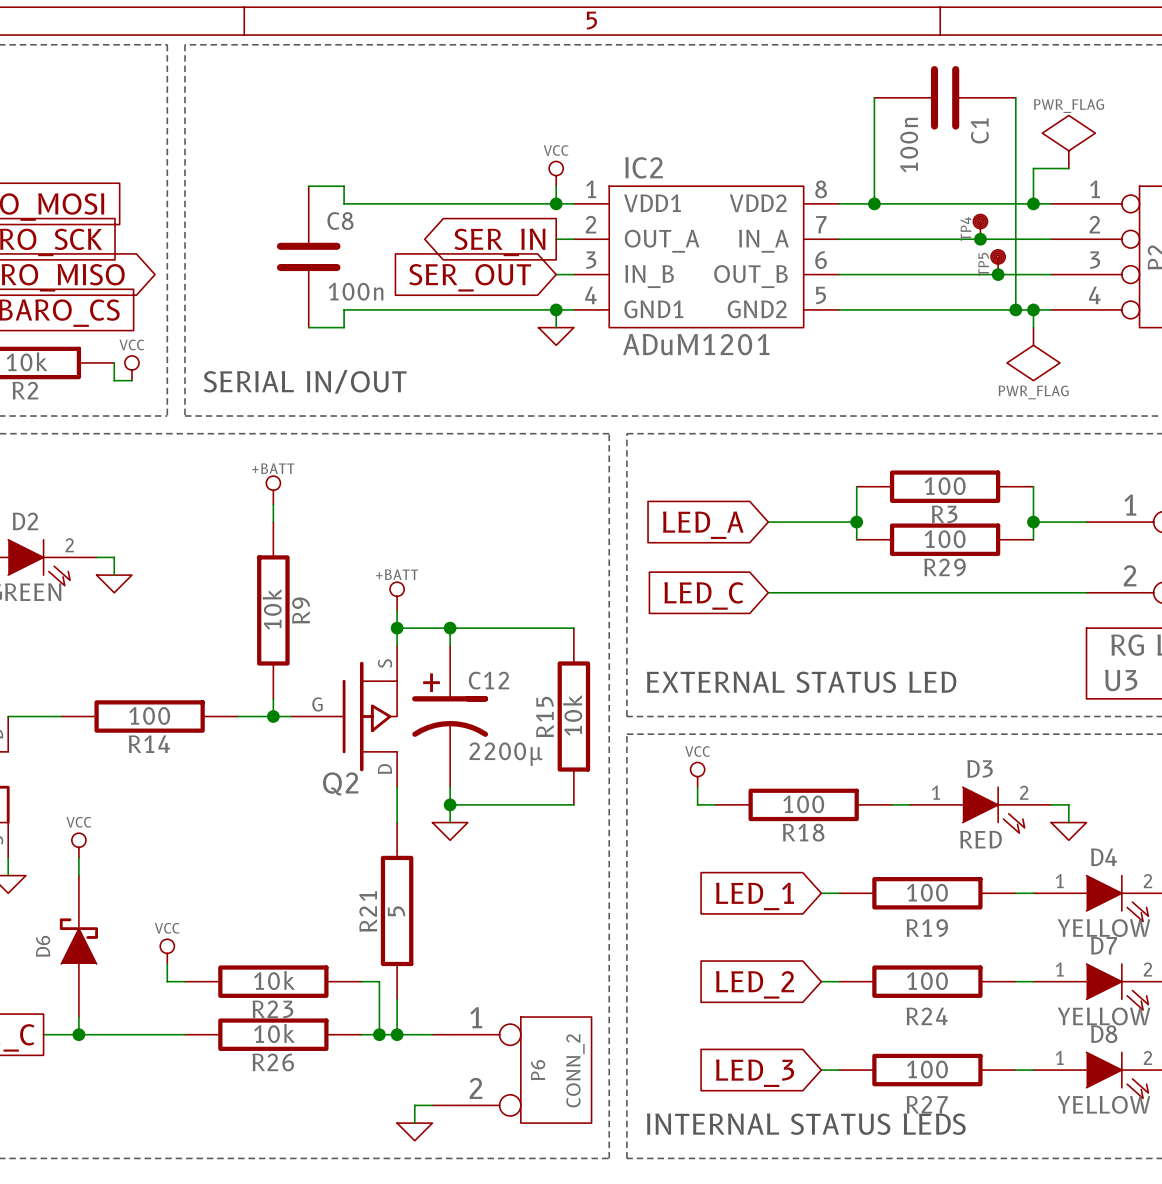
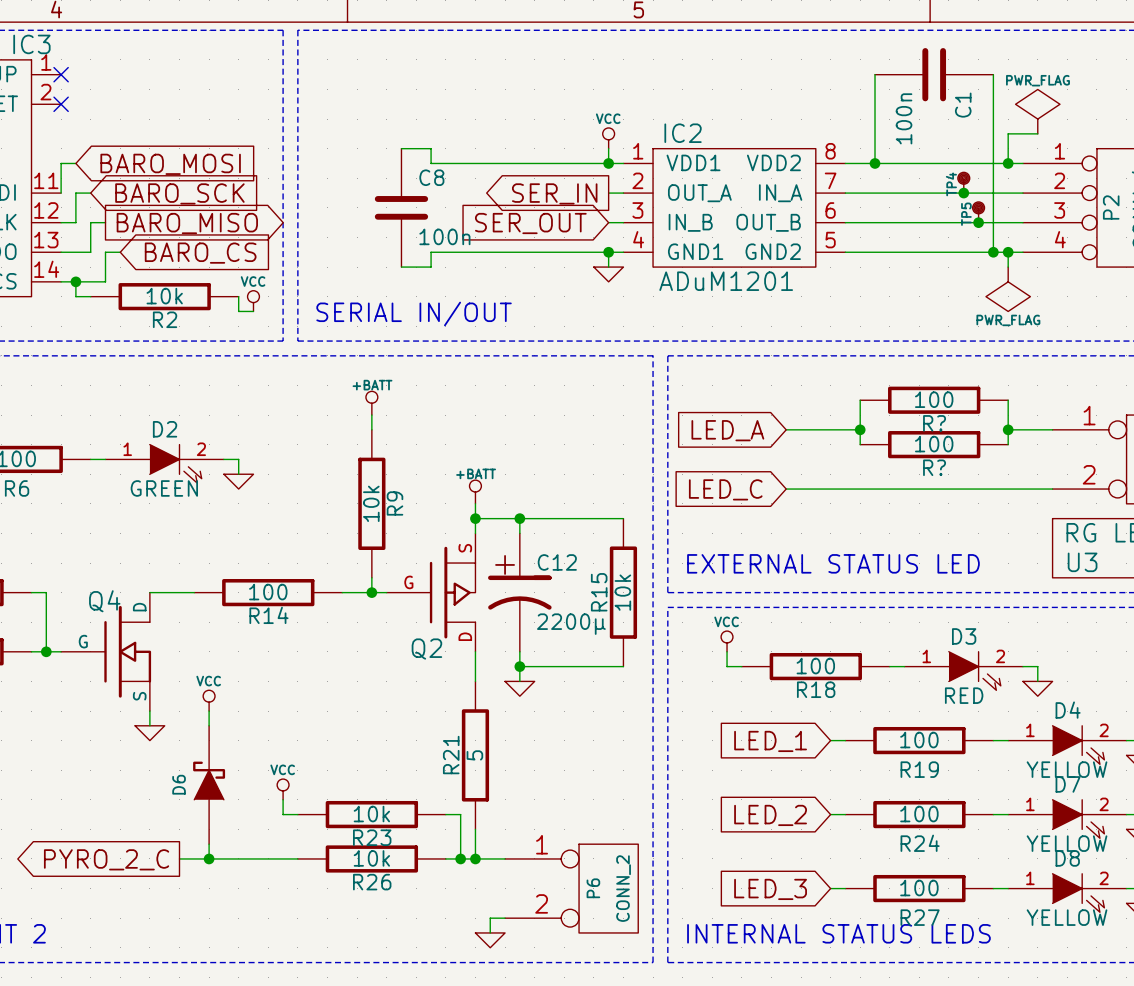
R3 name: R3 (944, 514) -> R? (934, 423)
R29 name: R29 (944, 567) -> R? (934, 467)

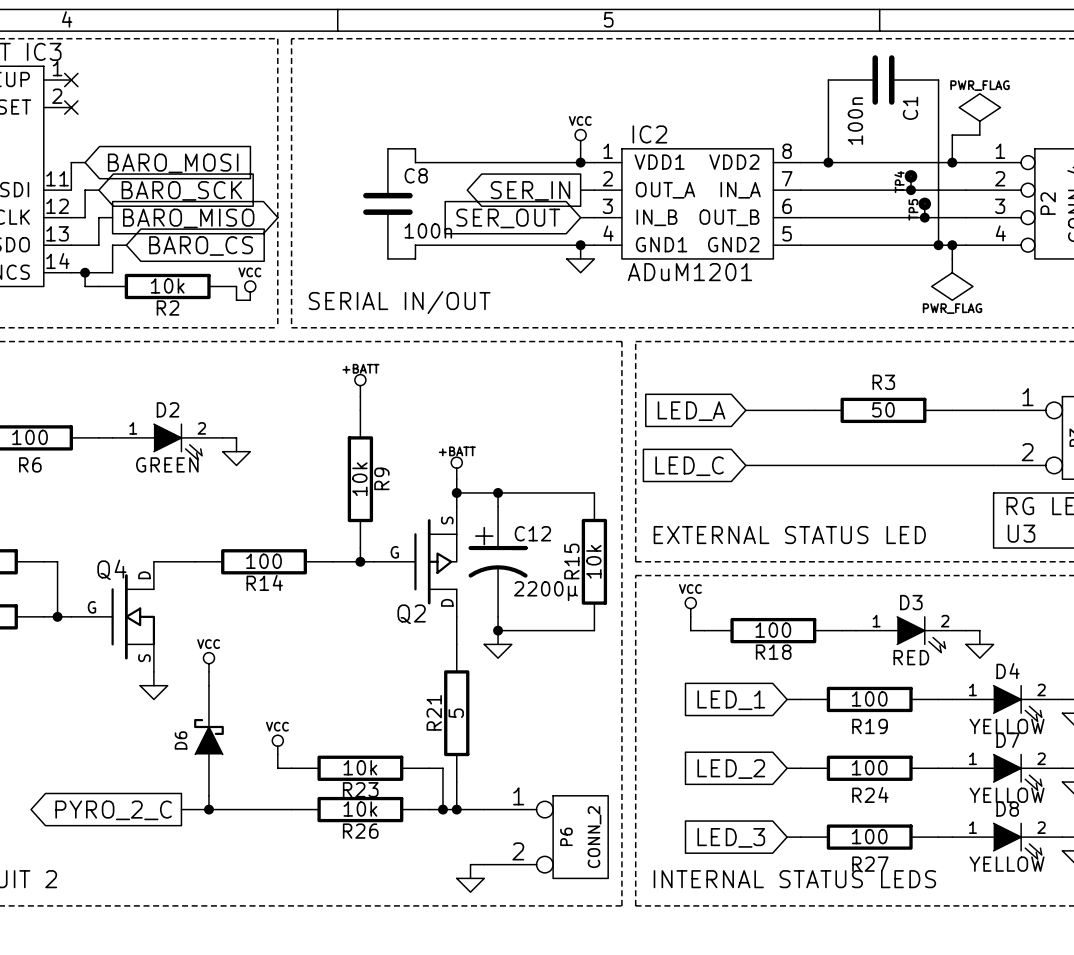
wire: (860, 400) (860, 444) -> none
R?: 100 (934, 400) -> none
wire: (1008, 400) (1008, 444) -> none
junction: (860, 429) -> none
R3: none -> 50 (883, 410)
junction: (1008, 429) -> none
R?: 100 (934, 444) -> none

